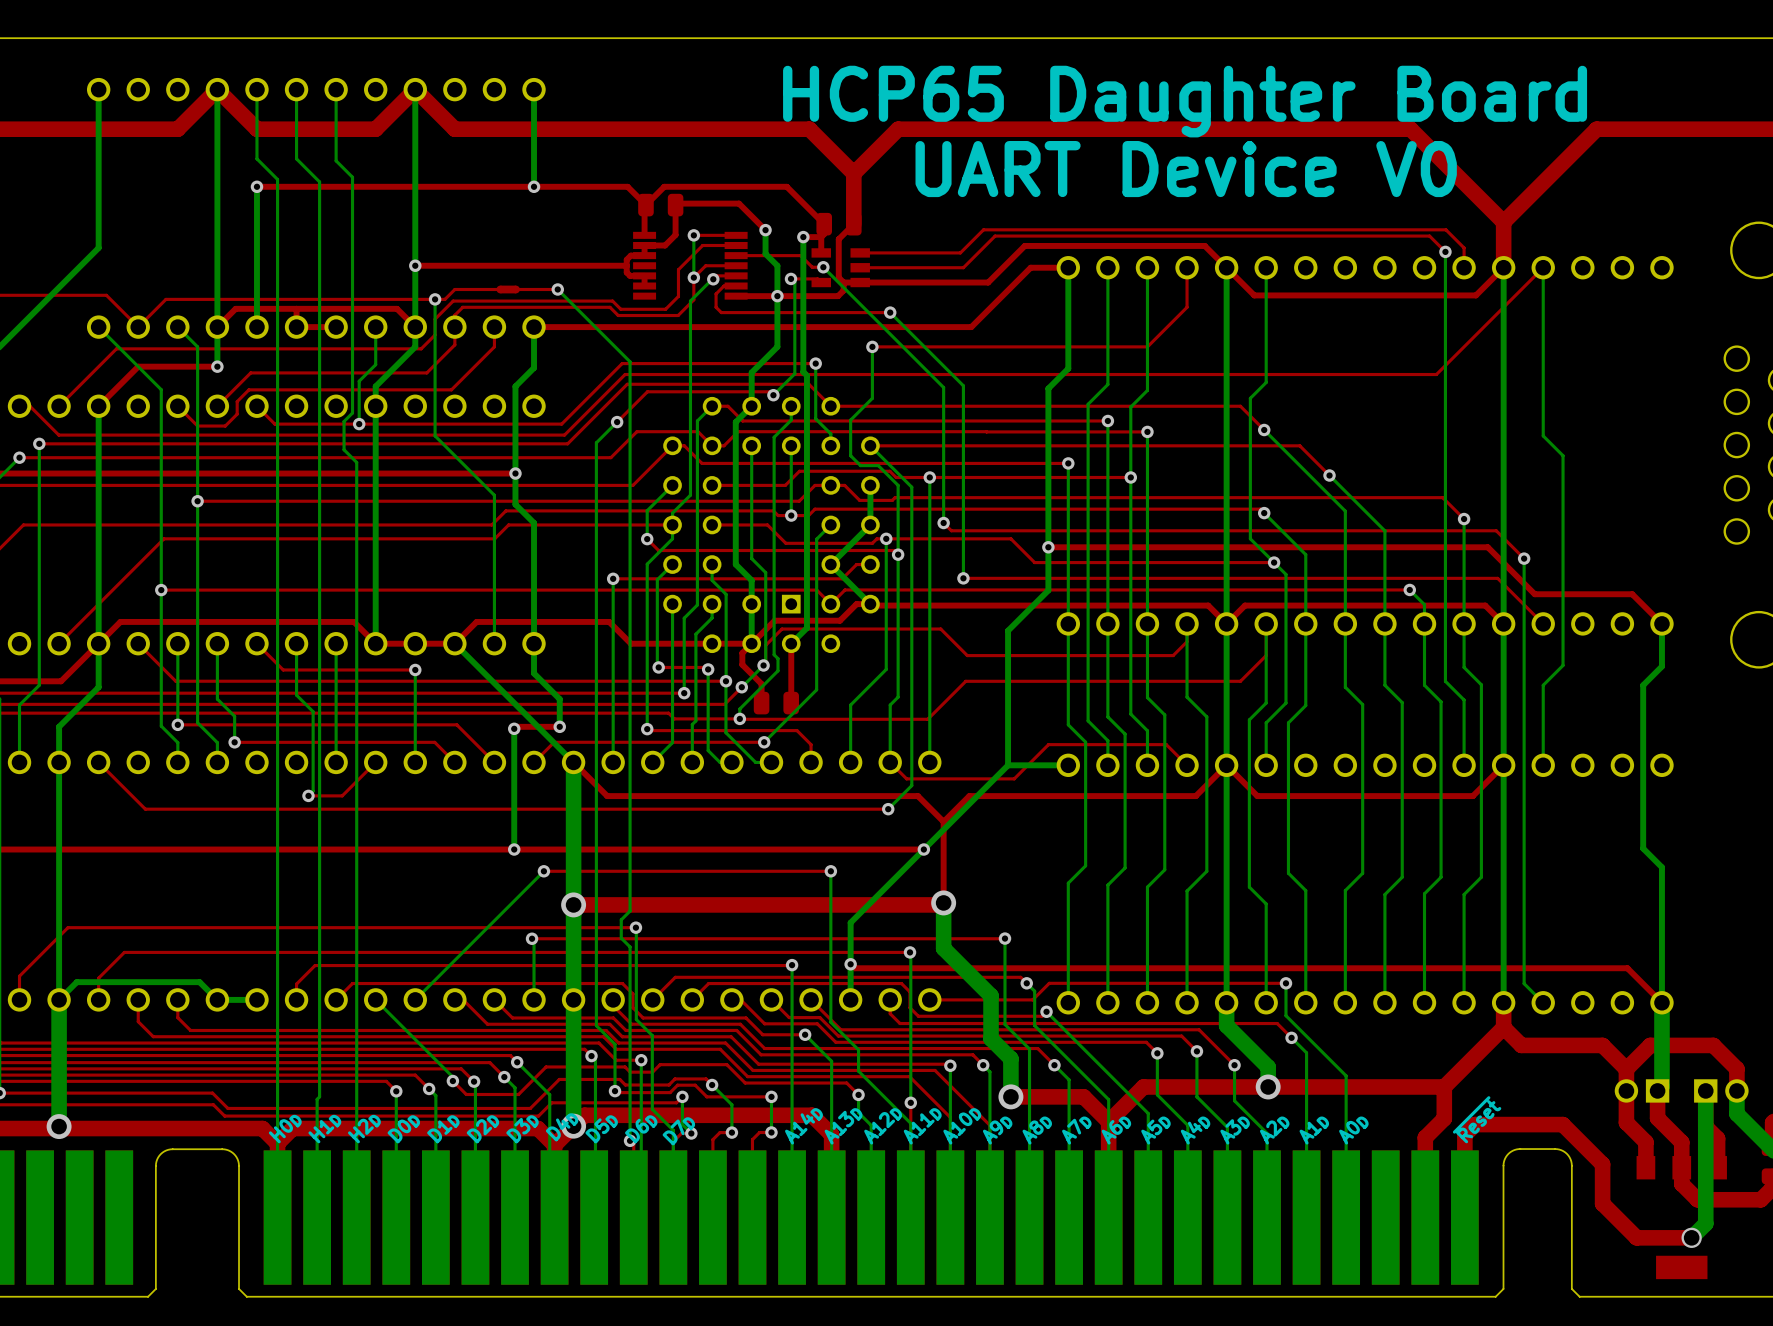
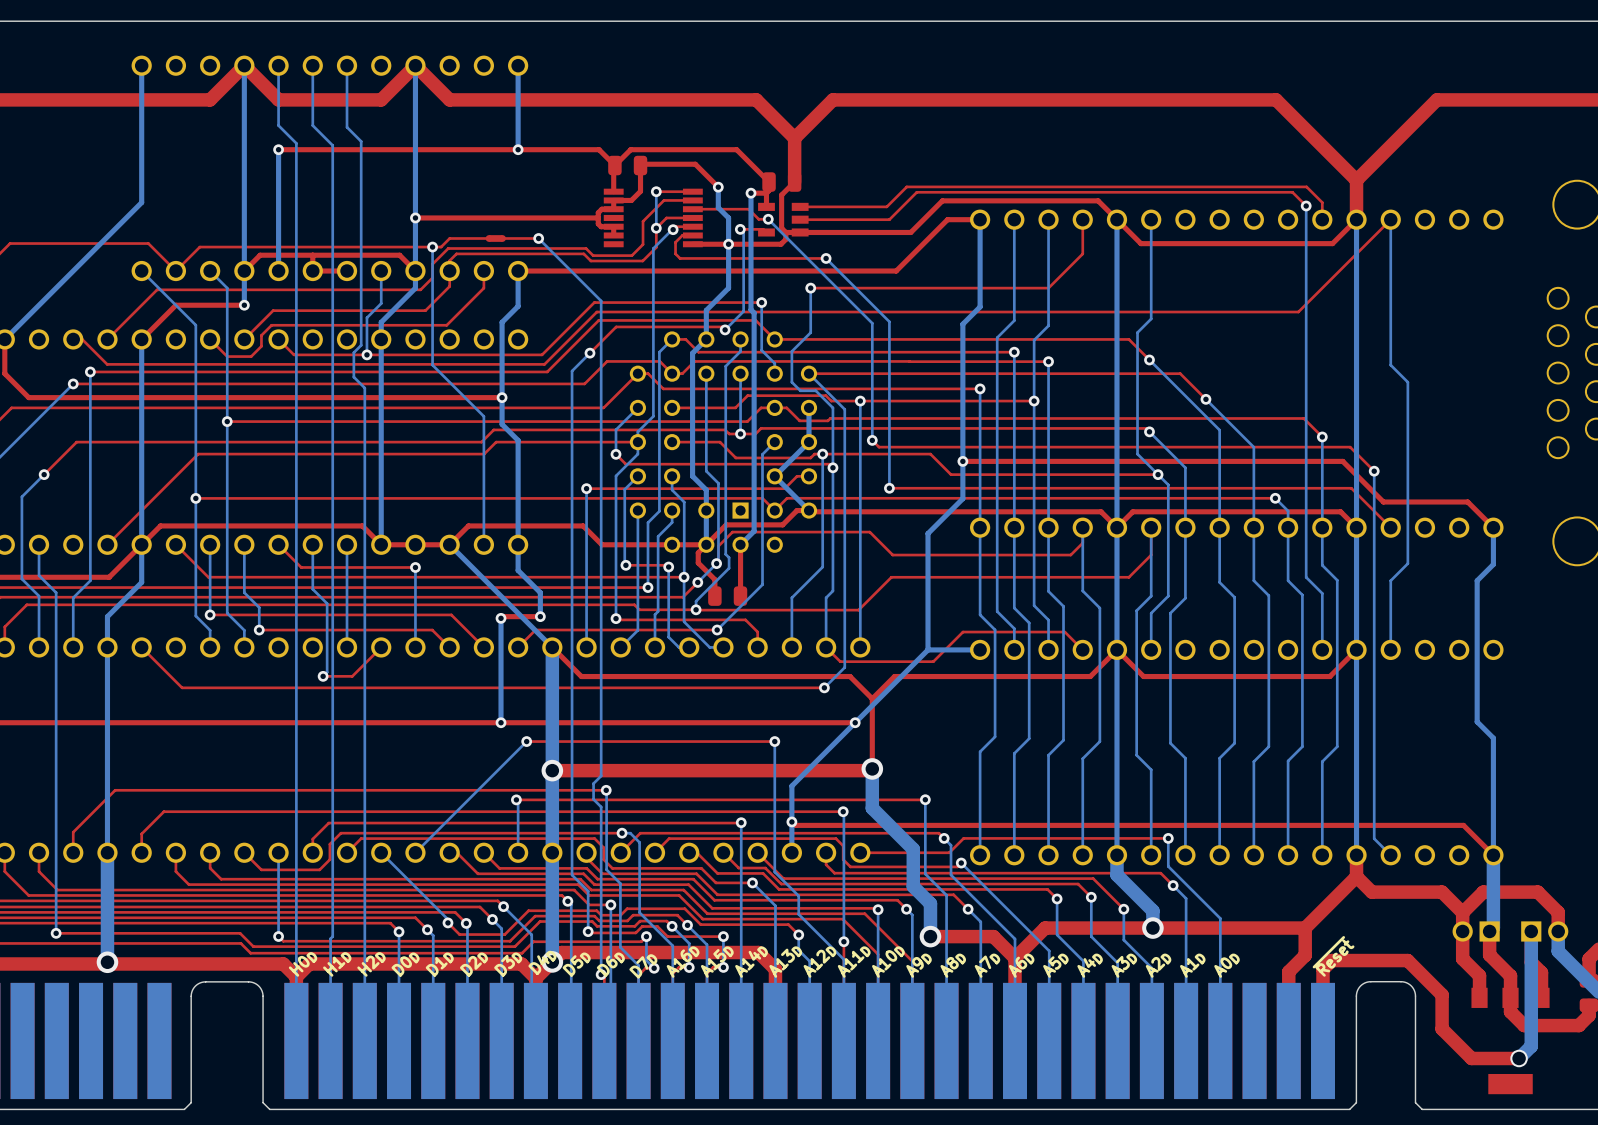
text: HCP65 Daughter Board (1185, 101) -> none
text: UART Device V0 (1186, 169) -> none
top track: none -> (622, 833) (340, 833) (329, 844) (329, 859) (319, 869) (261, 869) (244, 852)
bottom track: none -> (622, 833) (630, 833) (639, 842) (639, 912) (672, 945) (672, 1040)
via: none -> (622, 833)
bottom track: (256, 999) (217, 999) (199, 982) (76, 982) (59, 999) -> (278, 852) (278, 936)
top track: none -> (687, 925) (677, 915) (633, 915) (627, 920) (599, 920) (594, 916) (535, 916) (510, 941) (283, 941) (278, 936)
bottom track: none -> (687, 925) (707, 944) (707, 1040)
via: none -> (687, 925)
via: none -> (278, 936)
text: none -> A16D (683, 962)
text: none -> A15D (717, 962)

